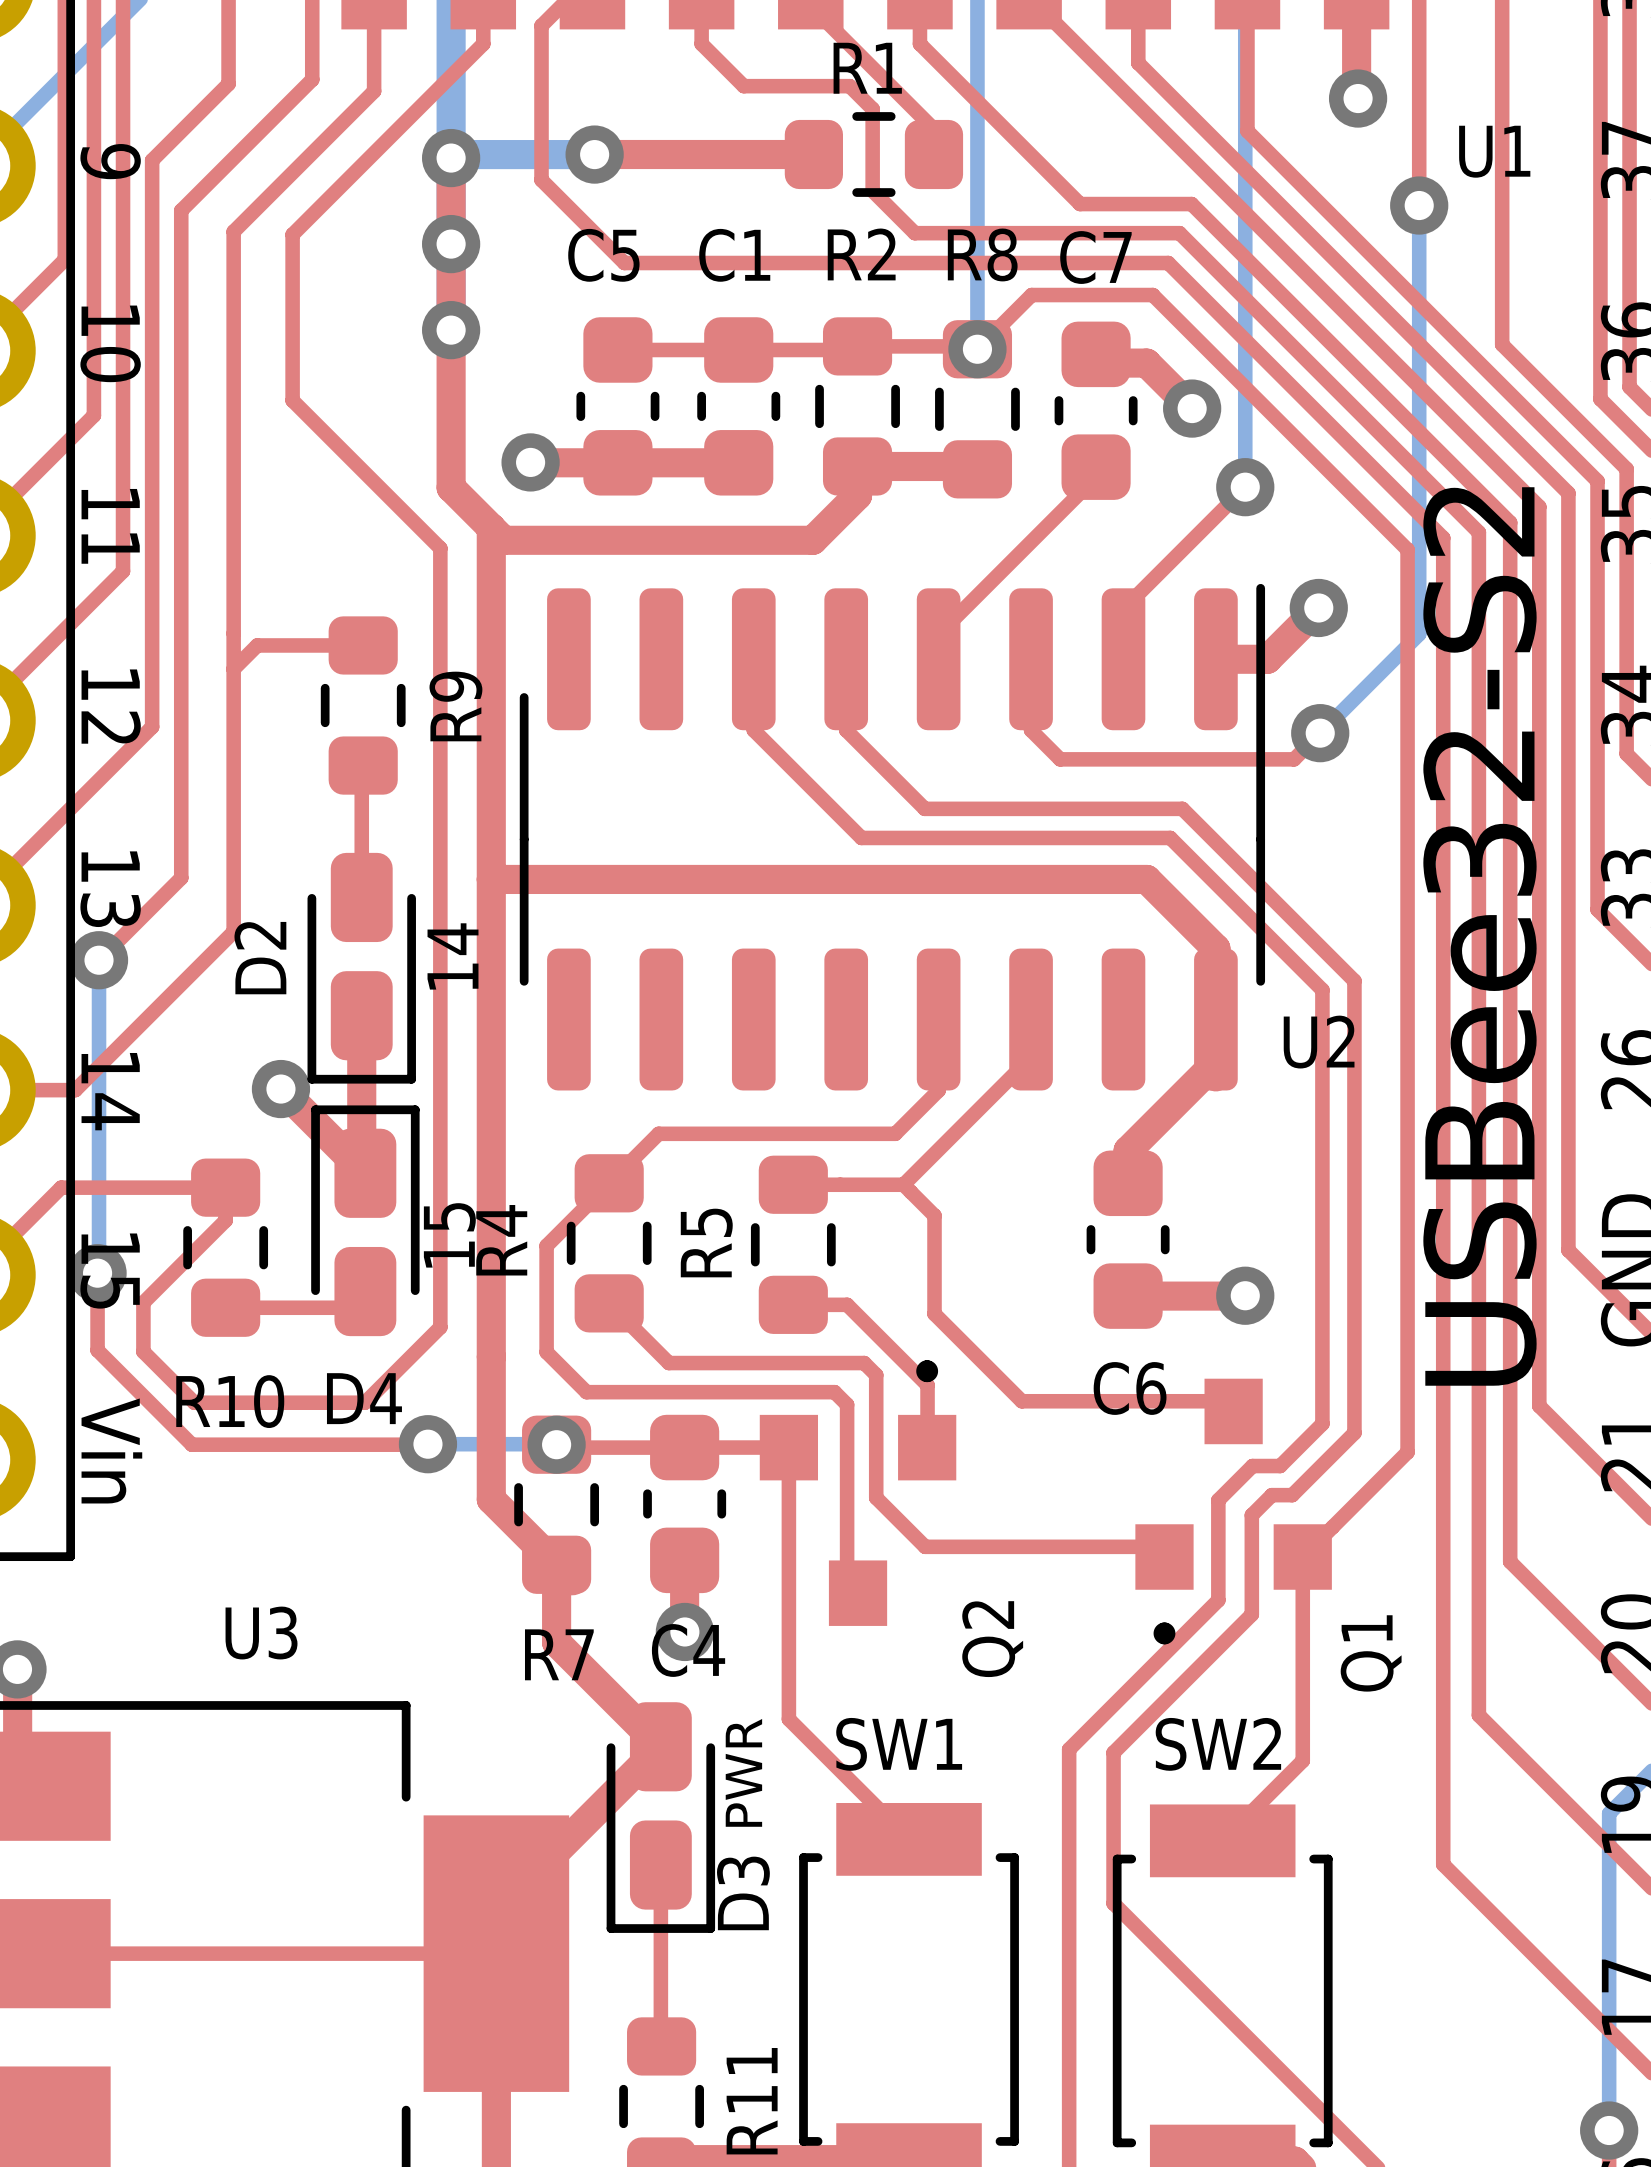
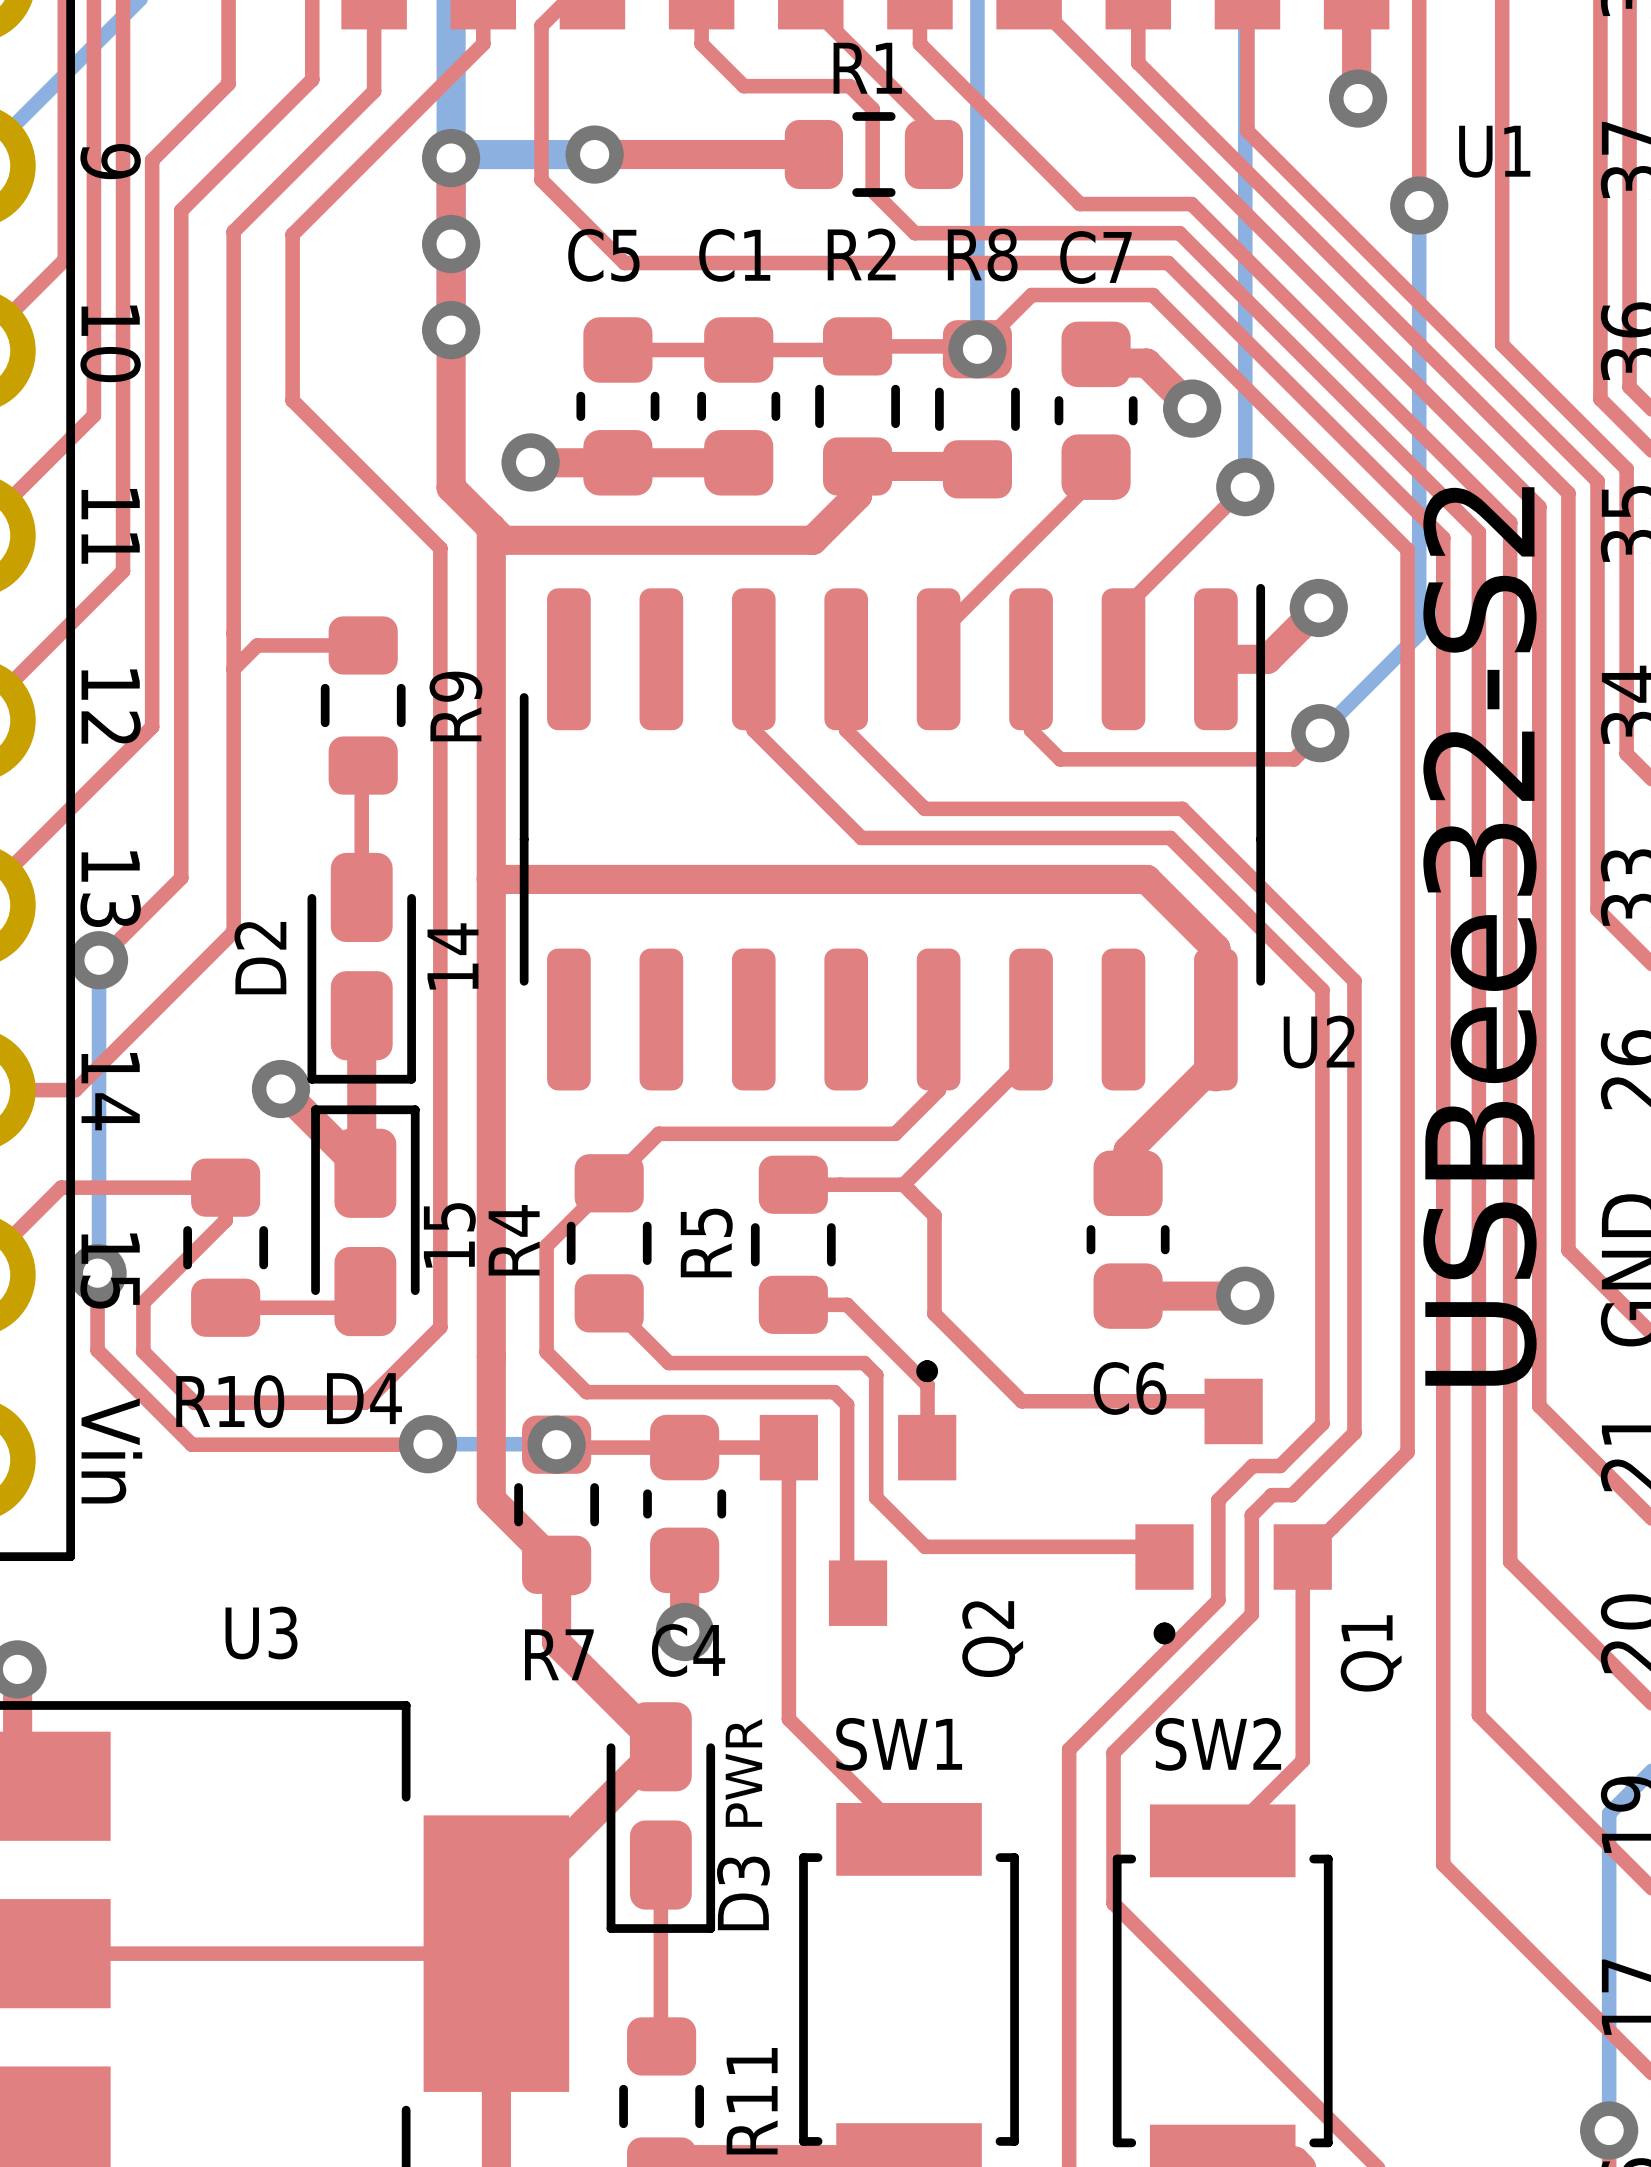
R4 name position: R4 (501, 1240) -> R4 (514, 1240)

